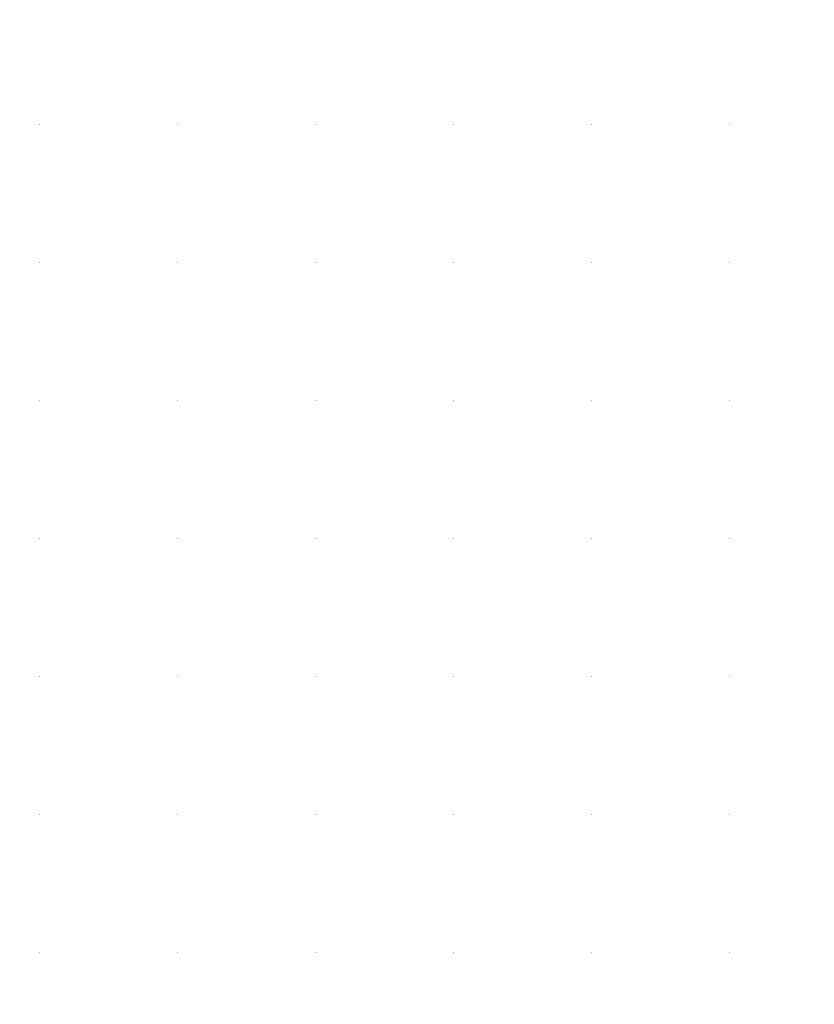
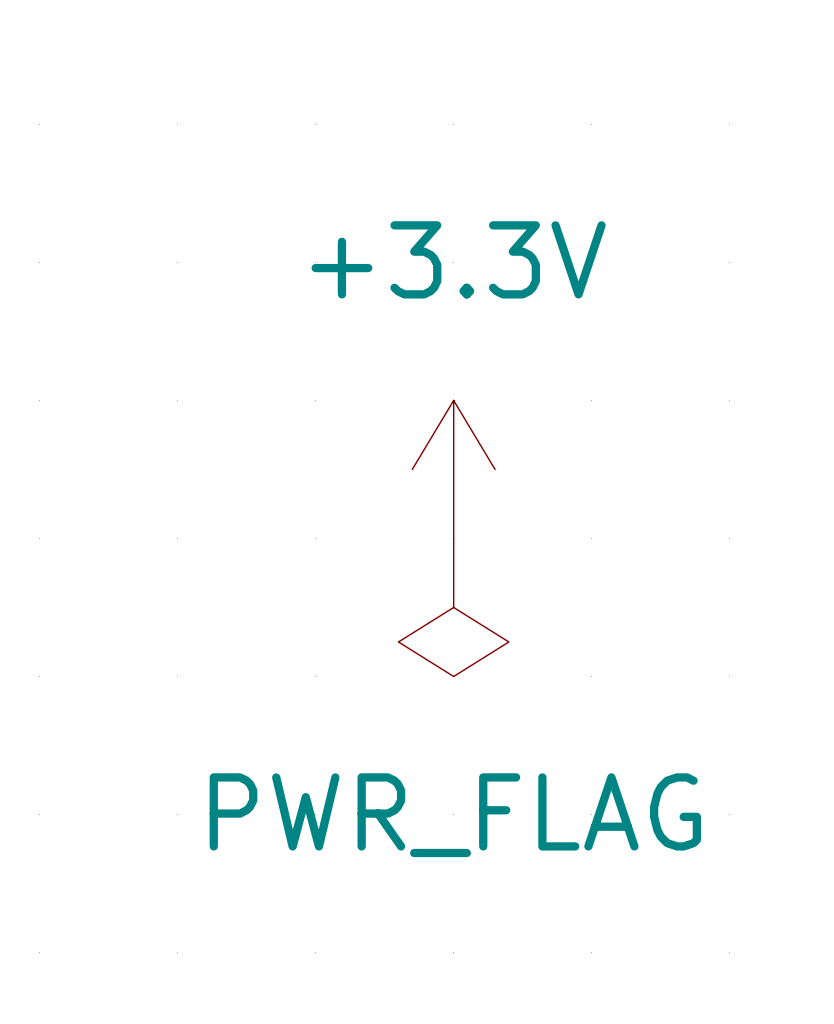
power symbol: none -> +3.3V (453, 469)
power symbol: none -> PWR_FLAG (453, 607)

